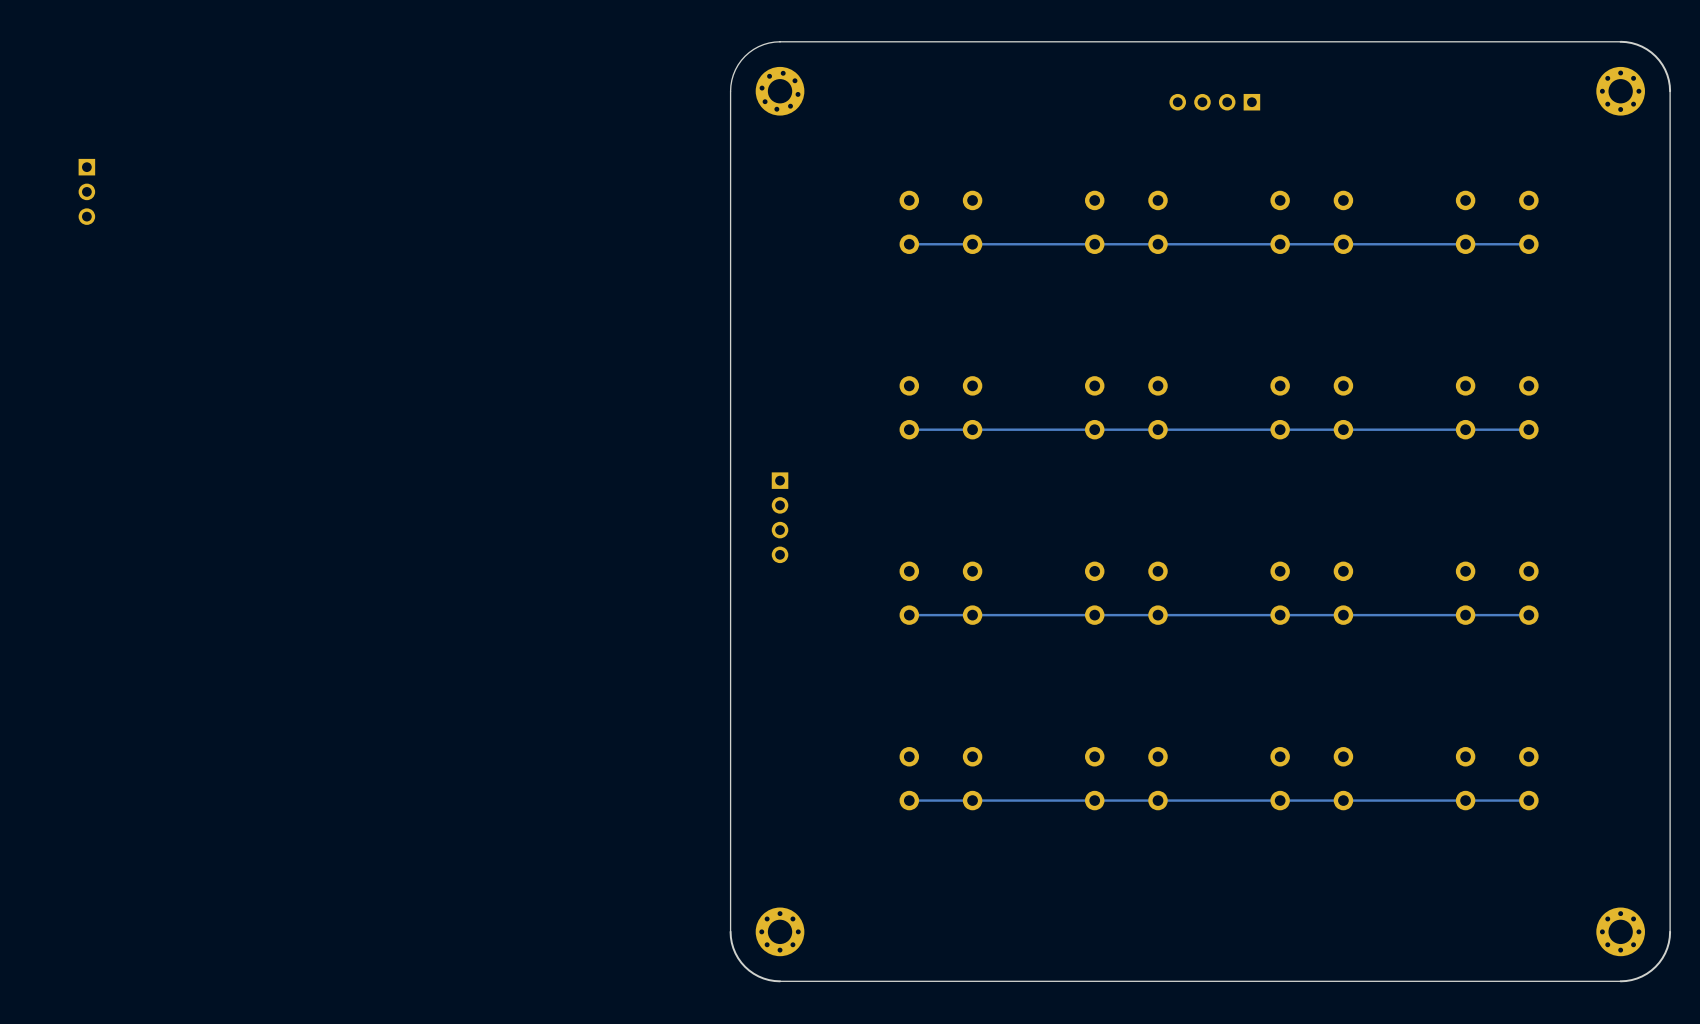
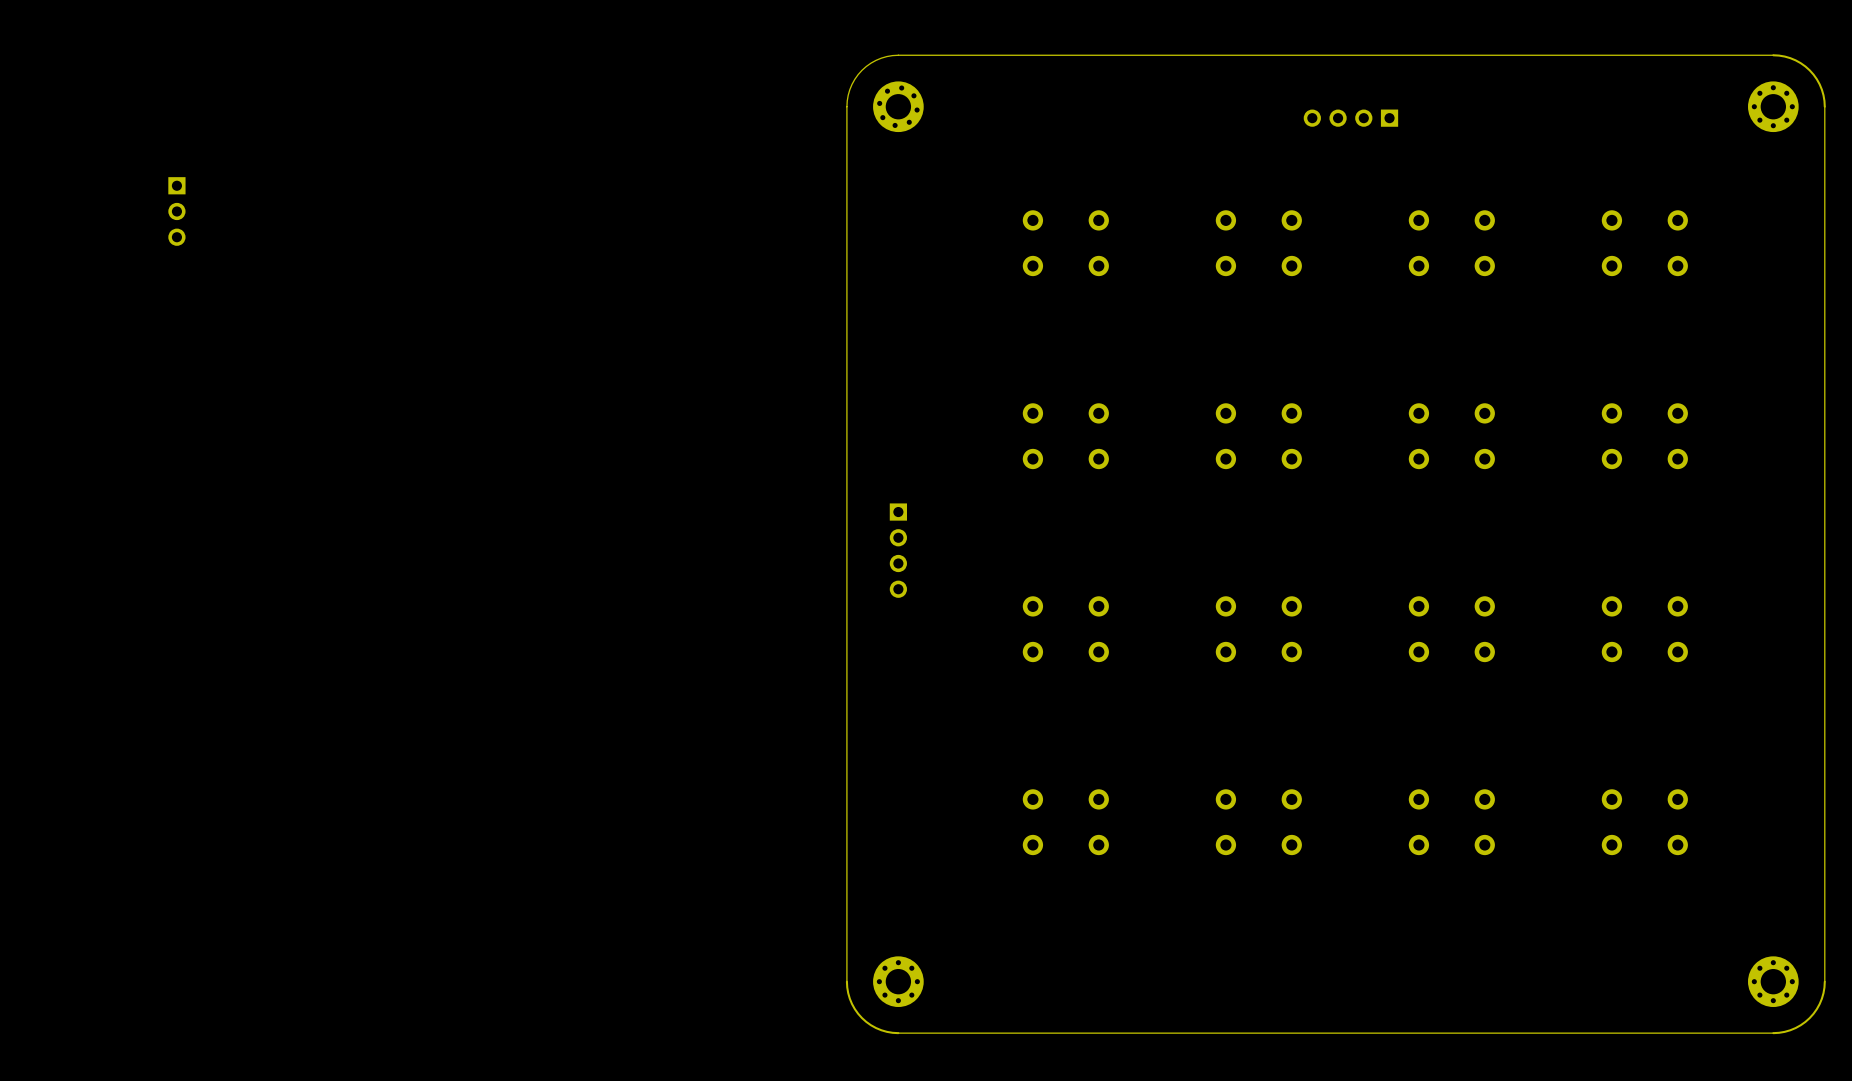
track: (1528, 244) (909, 244) -> none
track: (1528, 429) (909, 429) -> none
track: (1528, 615) (909, 615) -> none
track: (1528, 800) (909, 800) -> none

